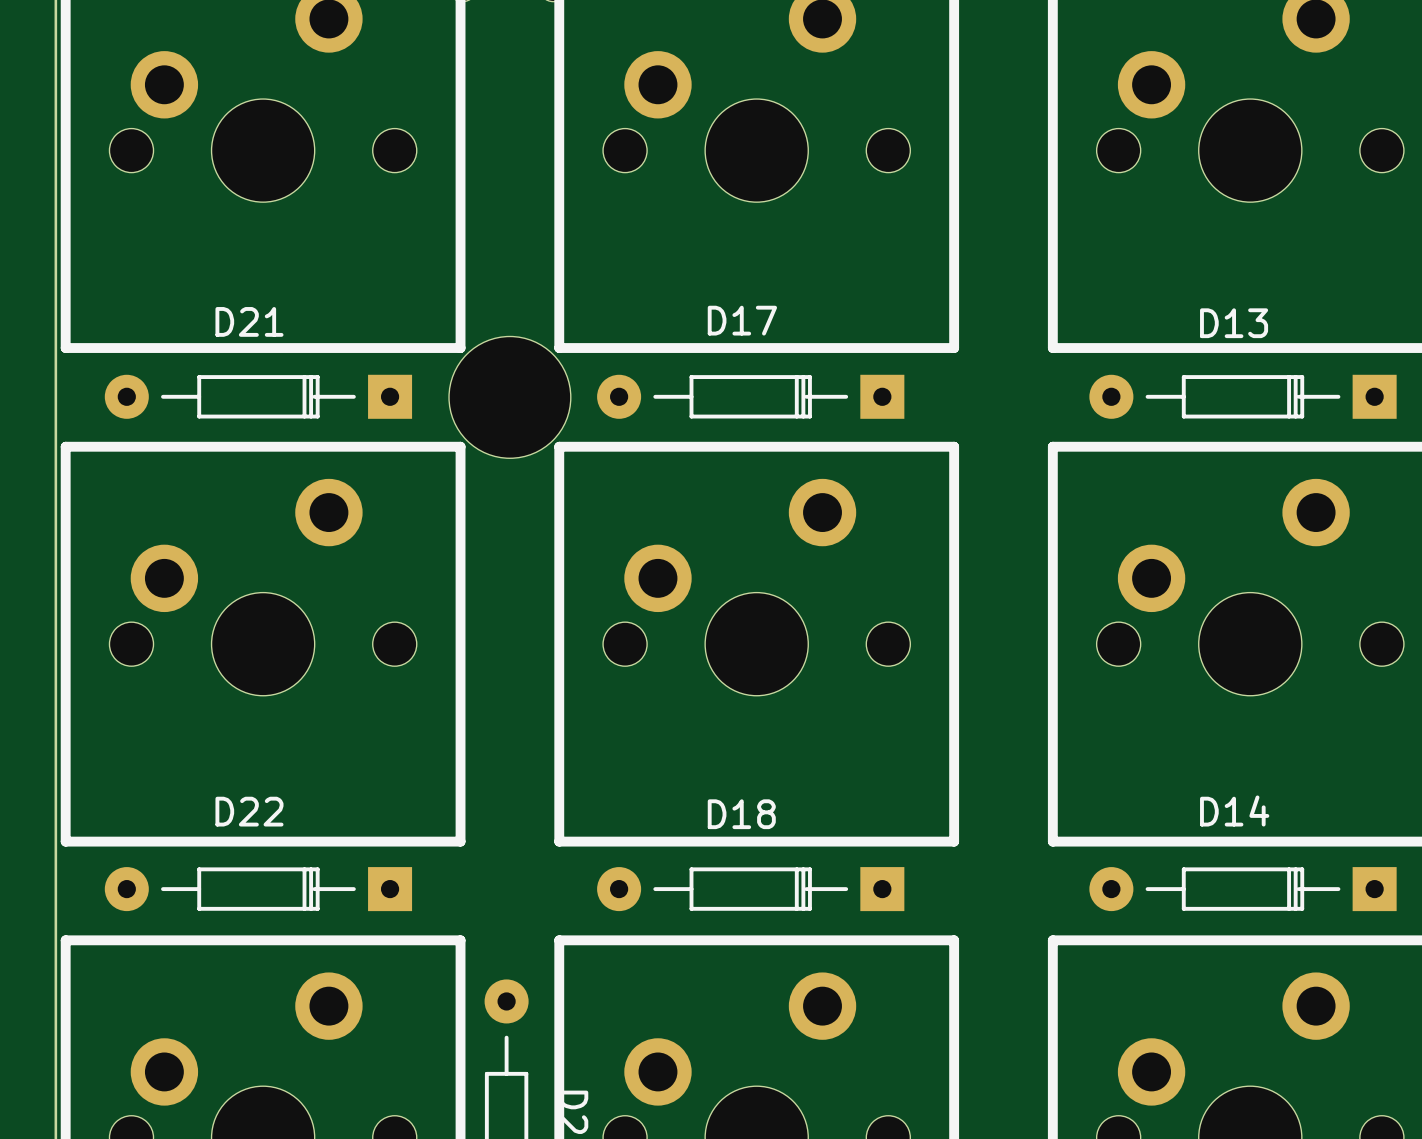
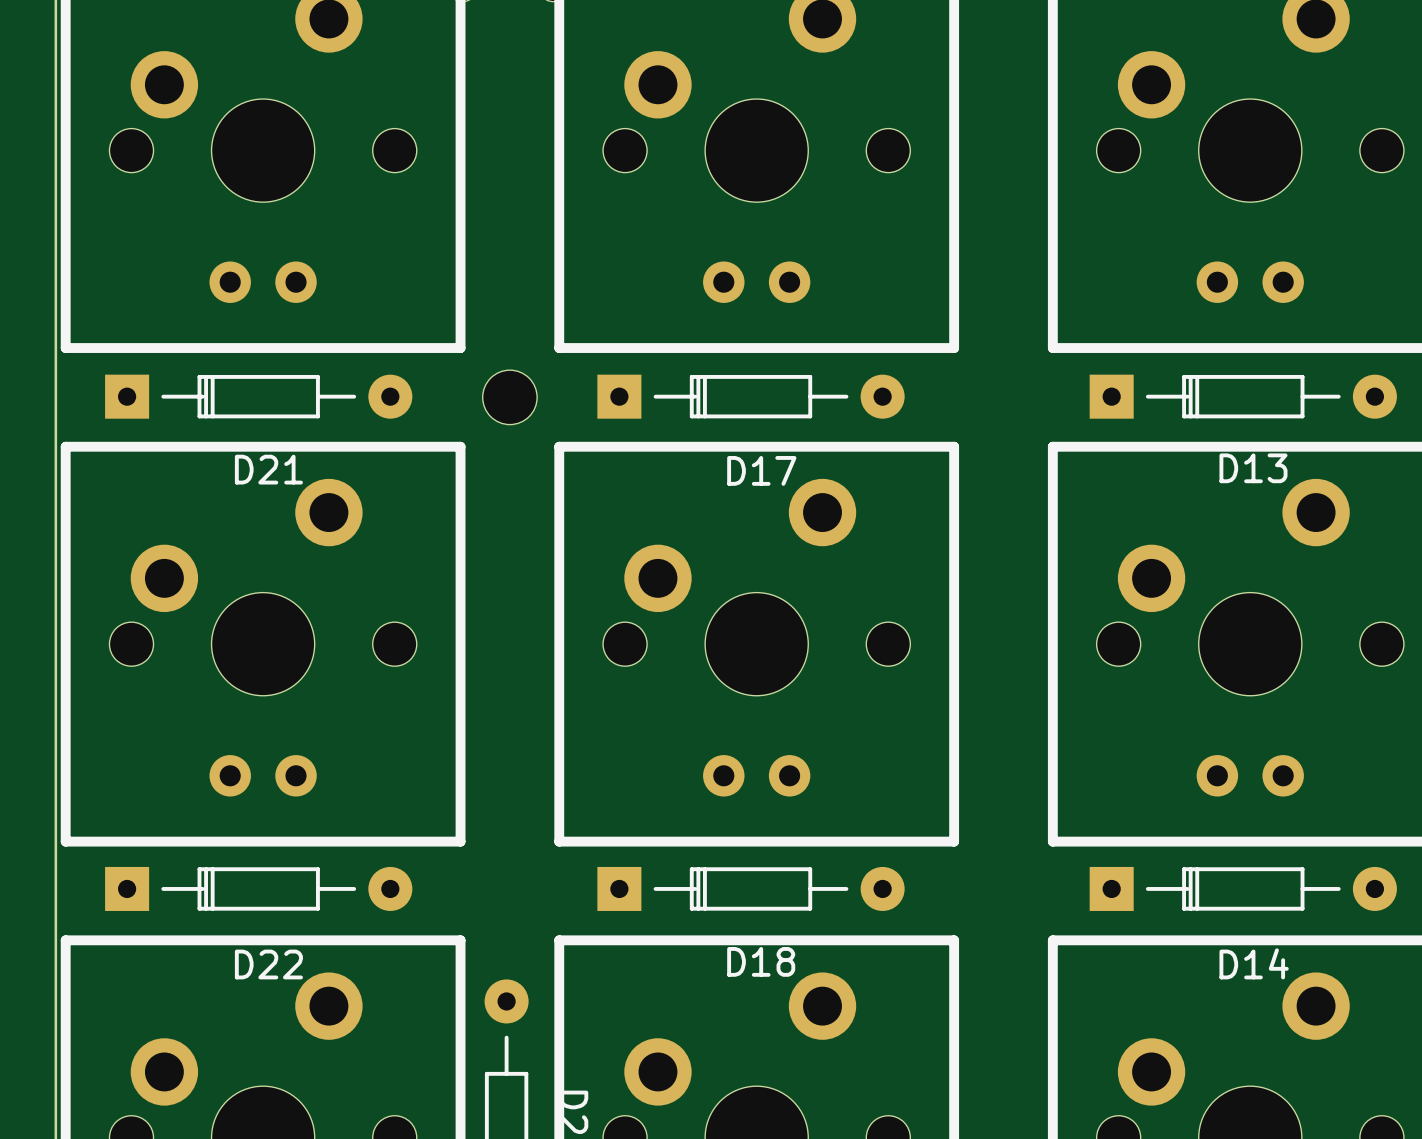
part: none -> (263, 282)
part: none -> (756, 282)
part: none -> (1250, 282)
part footprint: [449, 336, 571, 459] -> [482, 370, 538, 425]
D21 rotation: 0° (258, 396) -> 180° (258, 396)
D17 rotation: 0° (750, 396) -> 180° (751, 396)
D13 rotation: 0° (1243, 396) -> 180° (1243, 396)
part: none -> (263, 775)
part: none -> (756, 775)
part: none -> (1250, 775)
D22 rotation: 0° (258, 889) -> 180° (258, 888)
D18 rotation: 0° (750, 889) -> 180° (751, 888)
D14 rotation: 0° (1243, 889) -> 180° (1243, 888)

